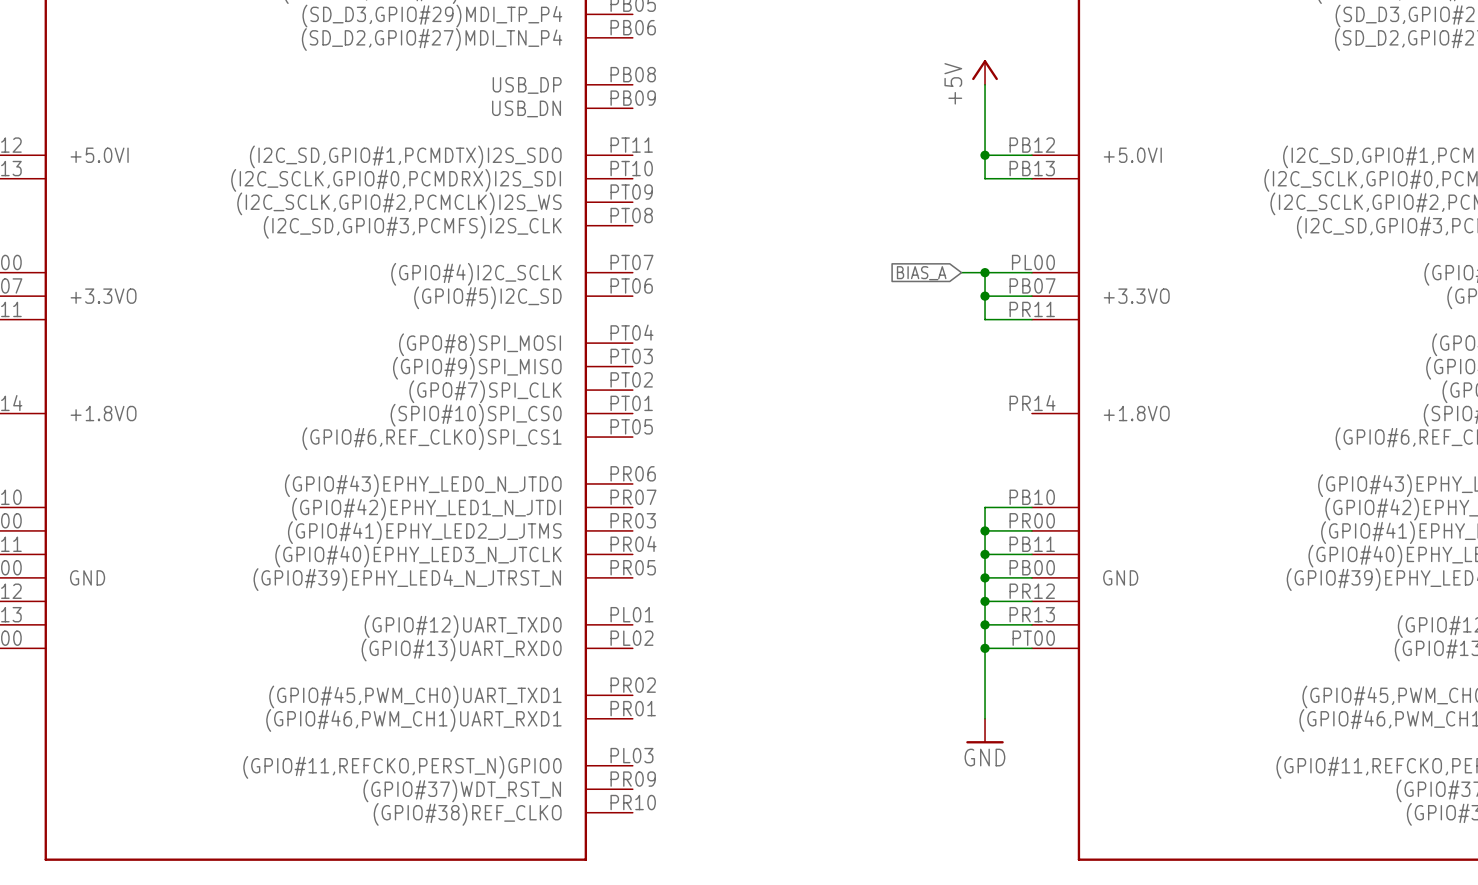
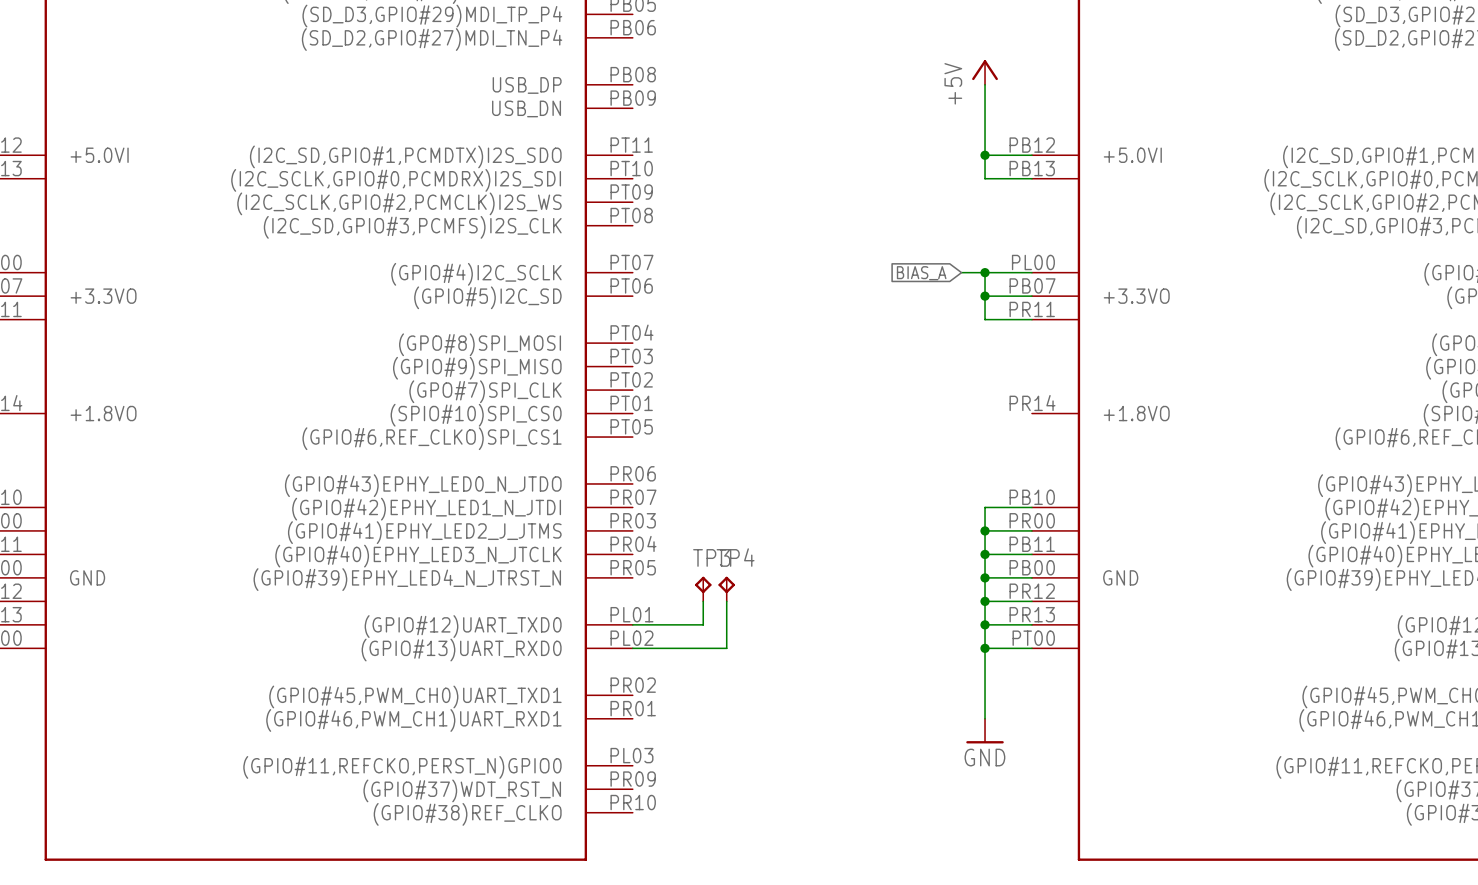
TP3: none -> (703, 589)
TP4: none -> (726, 589)
wire: none -> (703, 601) (703, 624) (632, 624)
wire: none -> (726, 601) (726, 648) (632, 648)

